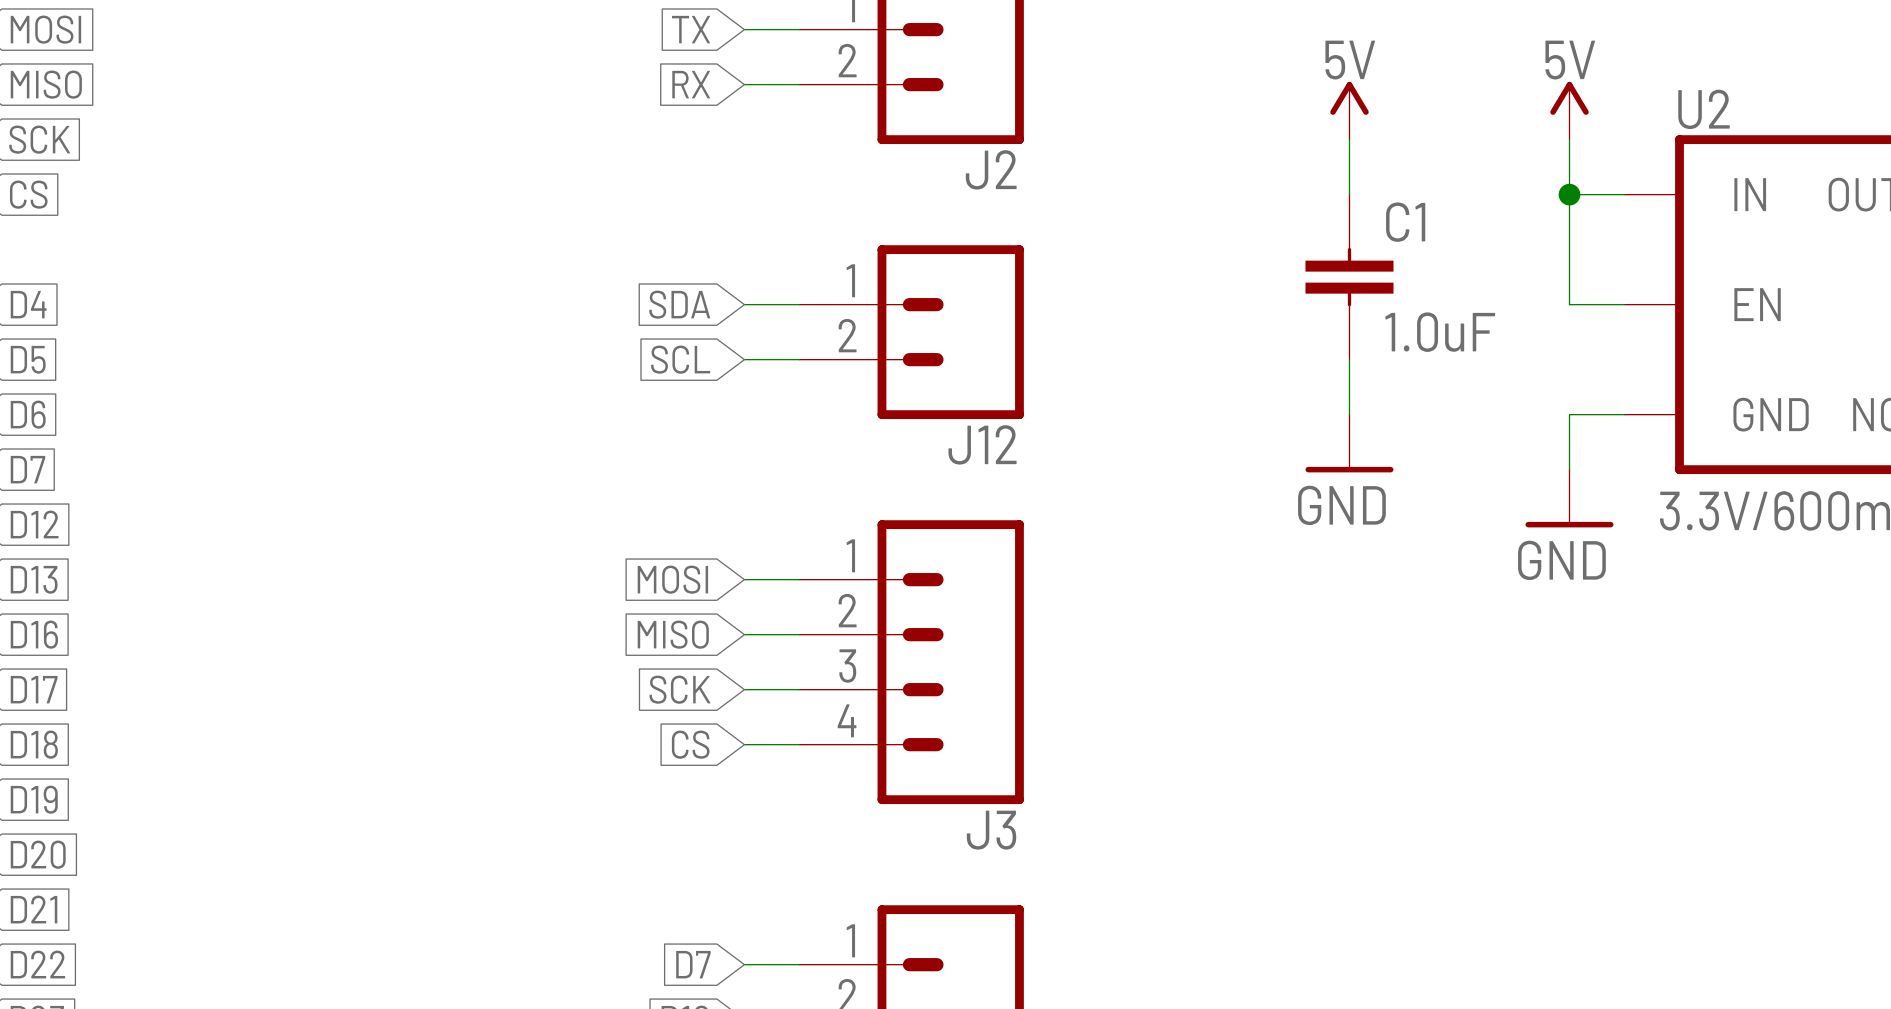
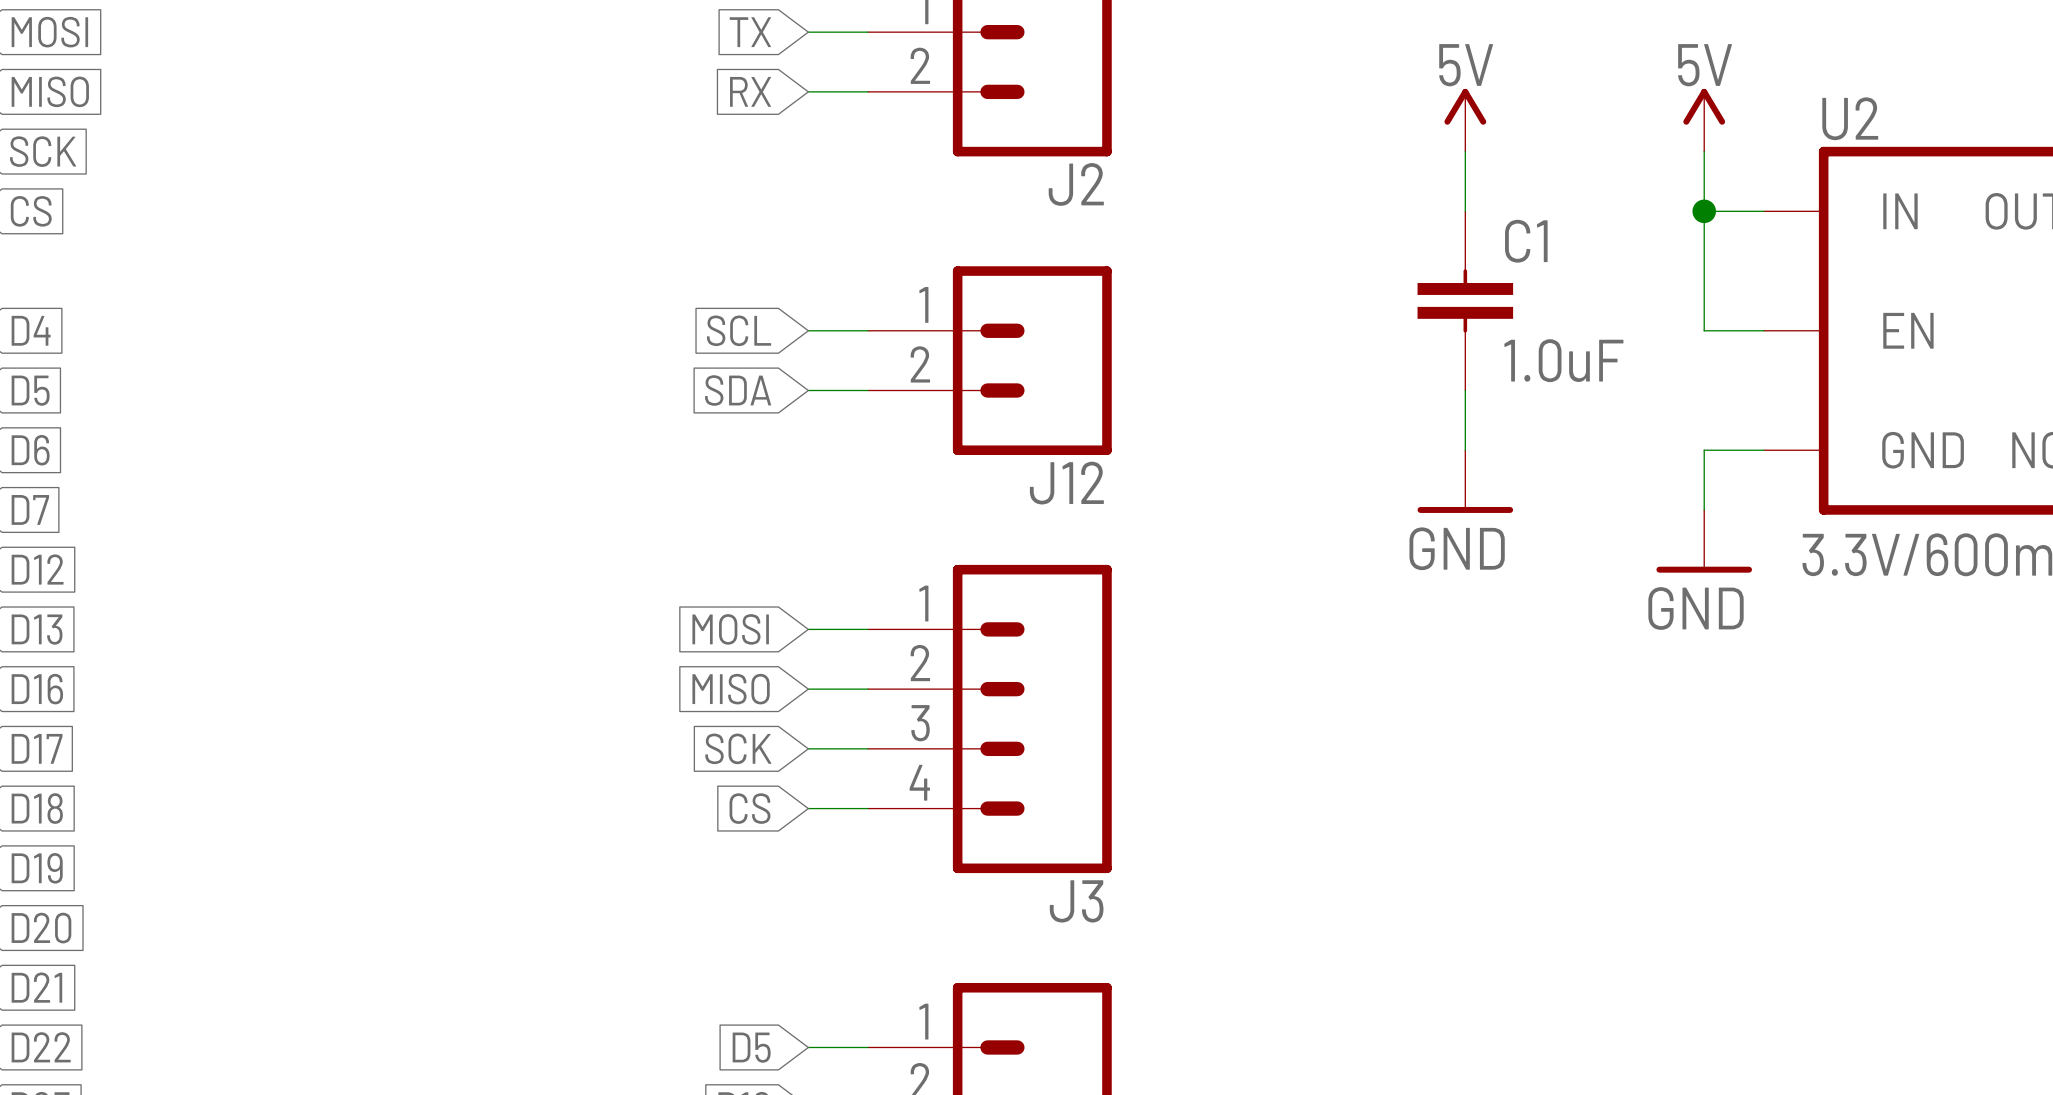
global label: SDA (679, 304) -> SCL (739, 330)
global label: SCL (680, 359) -> SDA (738, 390)
global label: D7 (693, 964) -> D5 (751, 1047)

